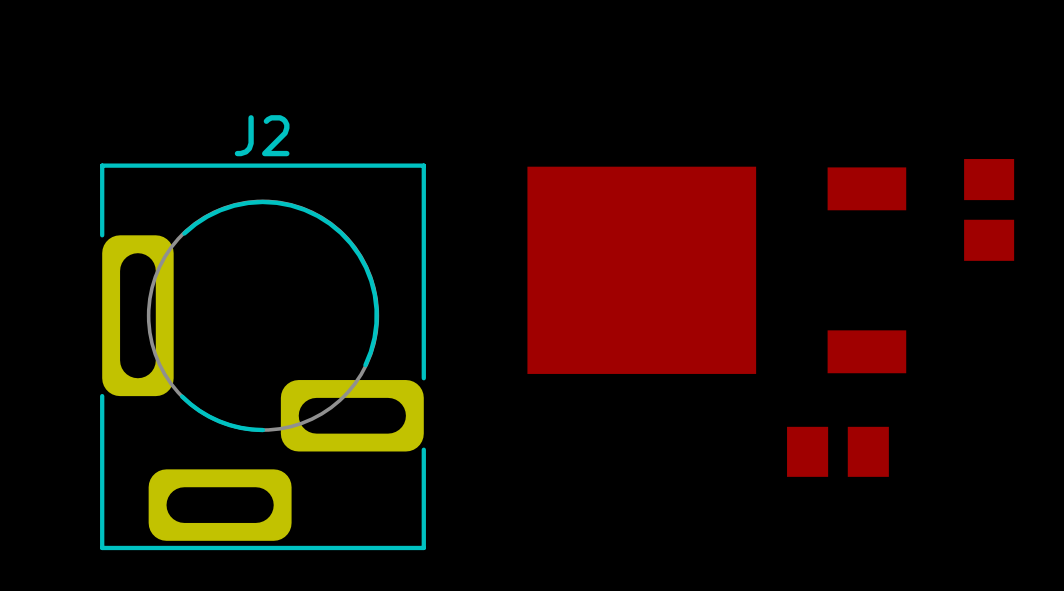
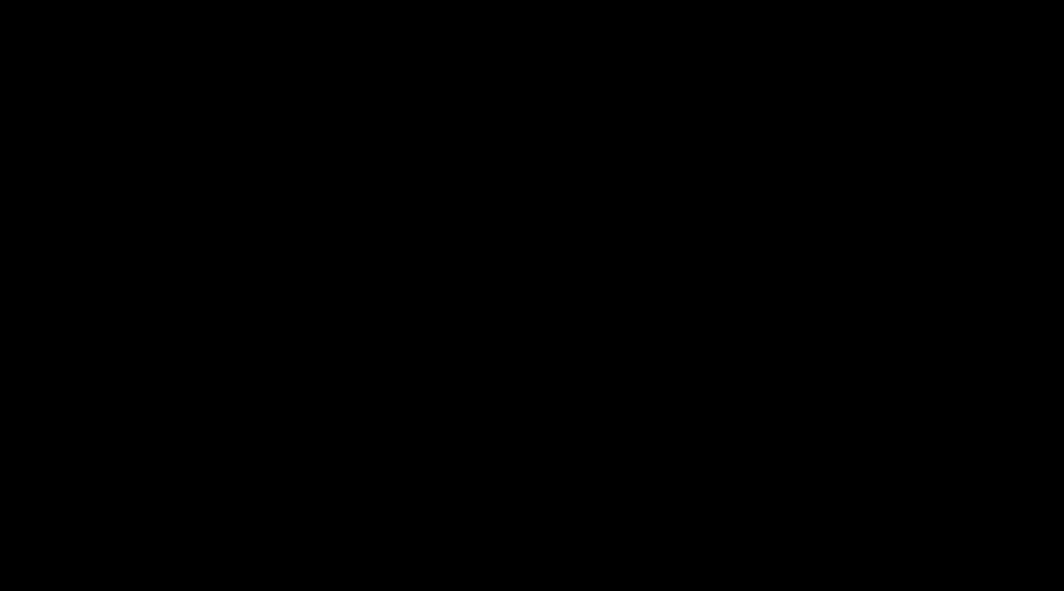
part: (989, 209) -> none
part: (716, 270) -> none
J2: (262, 356) -> none
part: (837, 451) -> none

